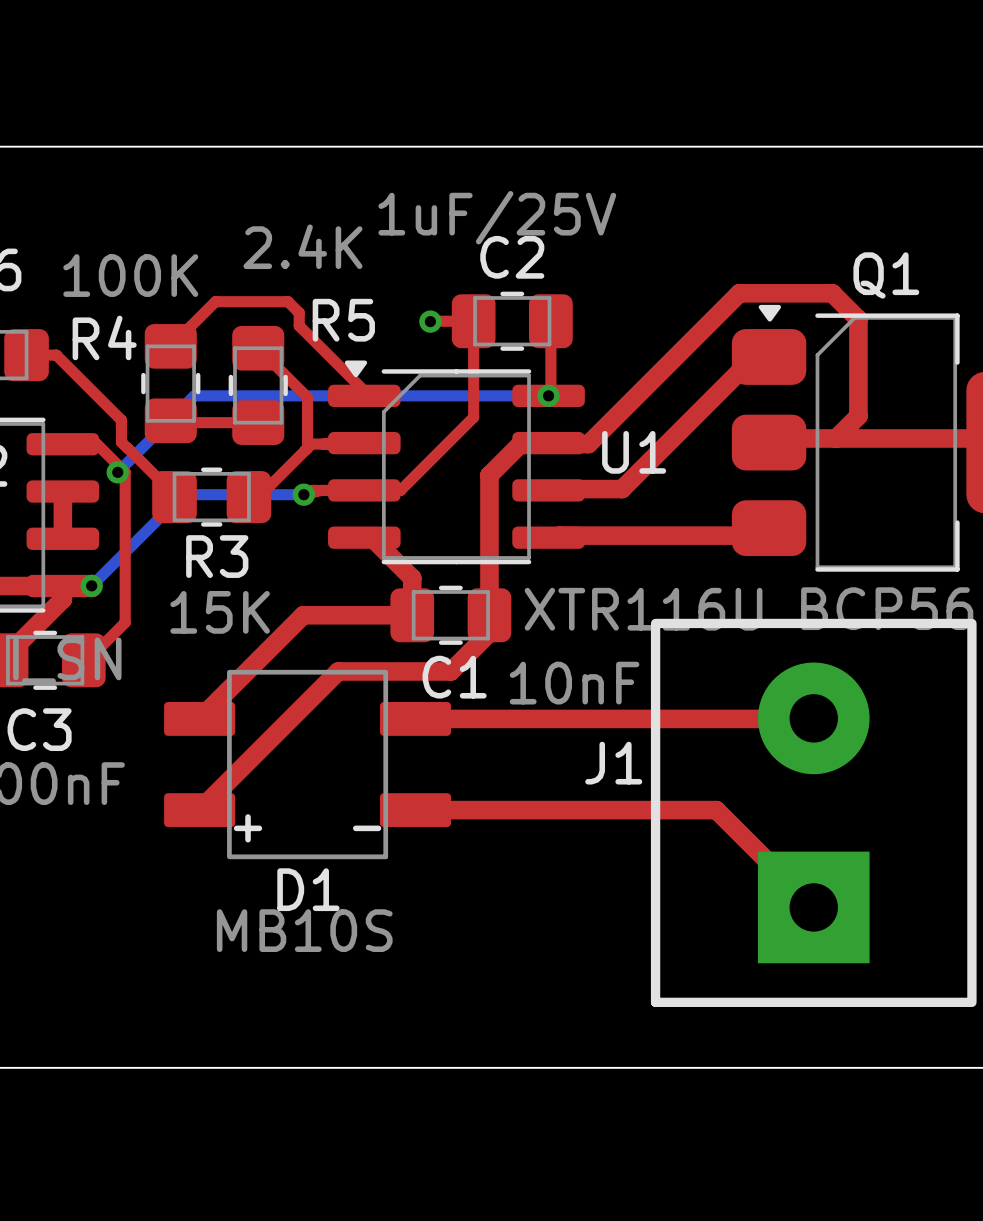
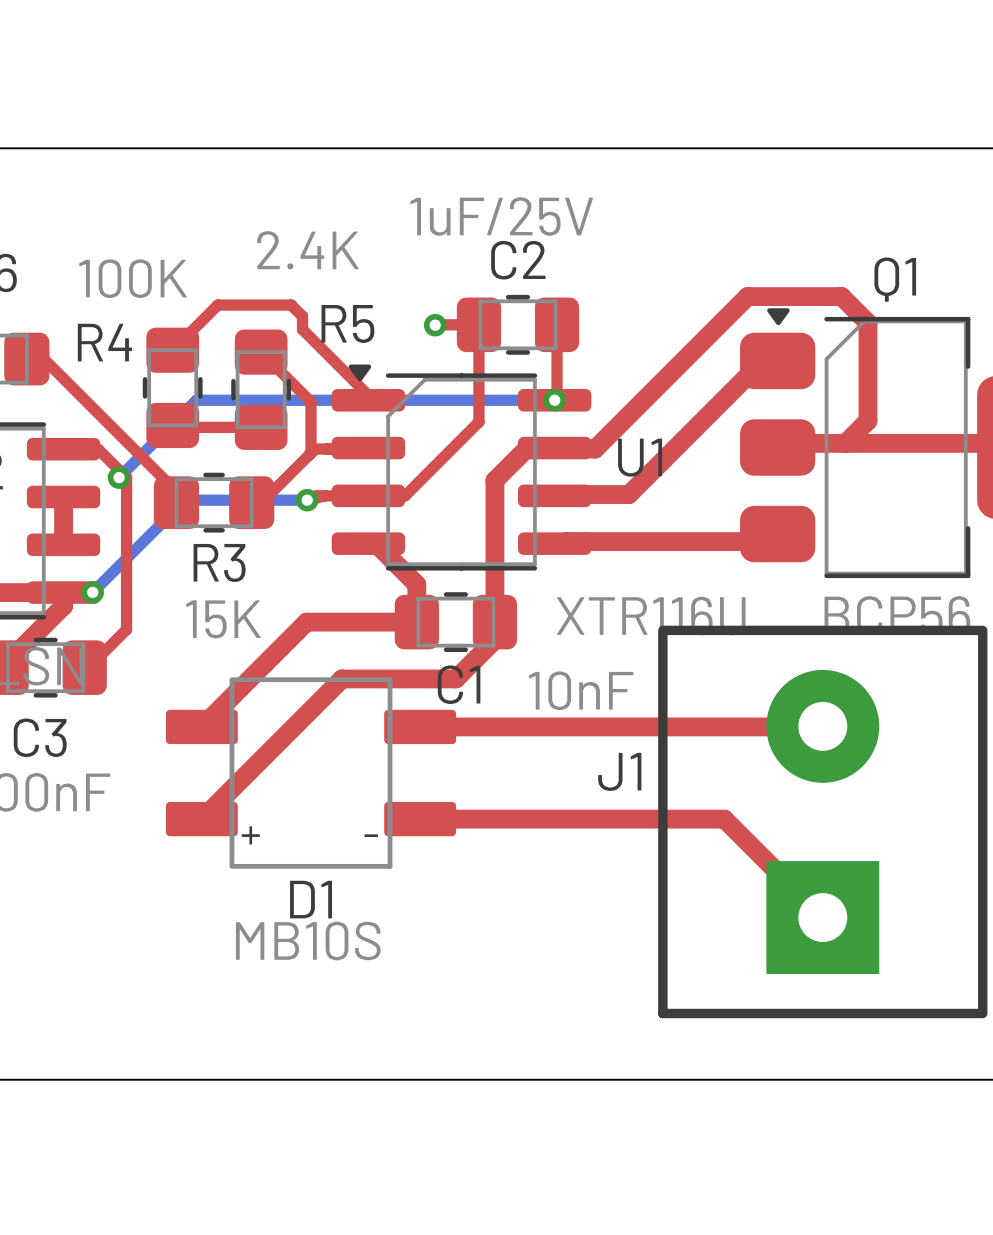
top track: (43, 355) (56, 355) (121, 420) (121, 442) (127, 448) -> (43, 359) (176, 491) (176, 500)
top track: (127, 448) (174, 494) -> none

